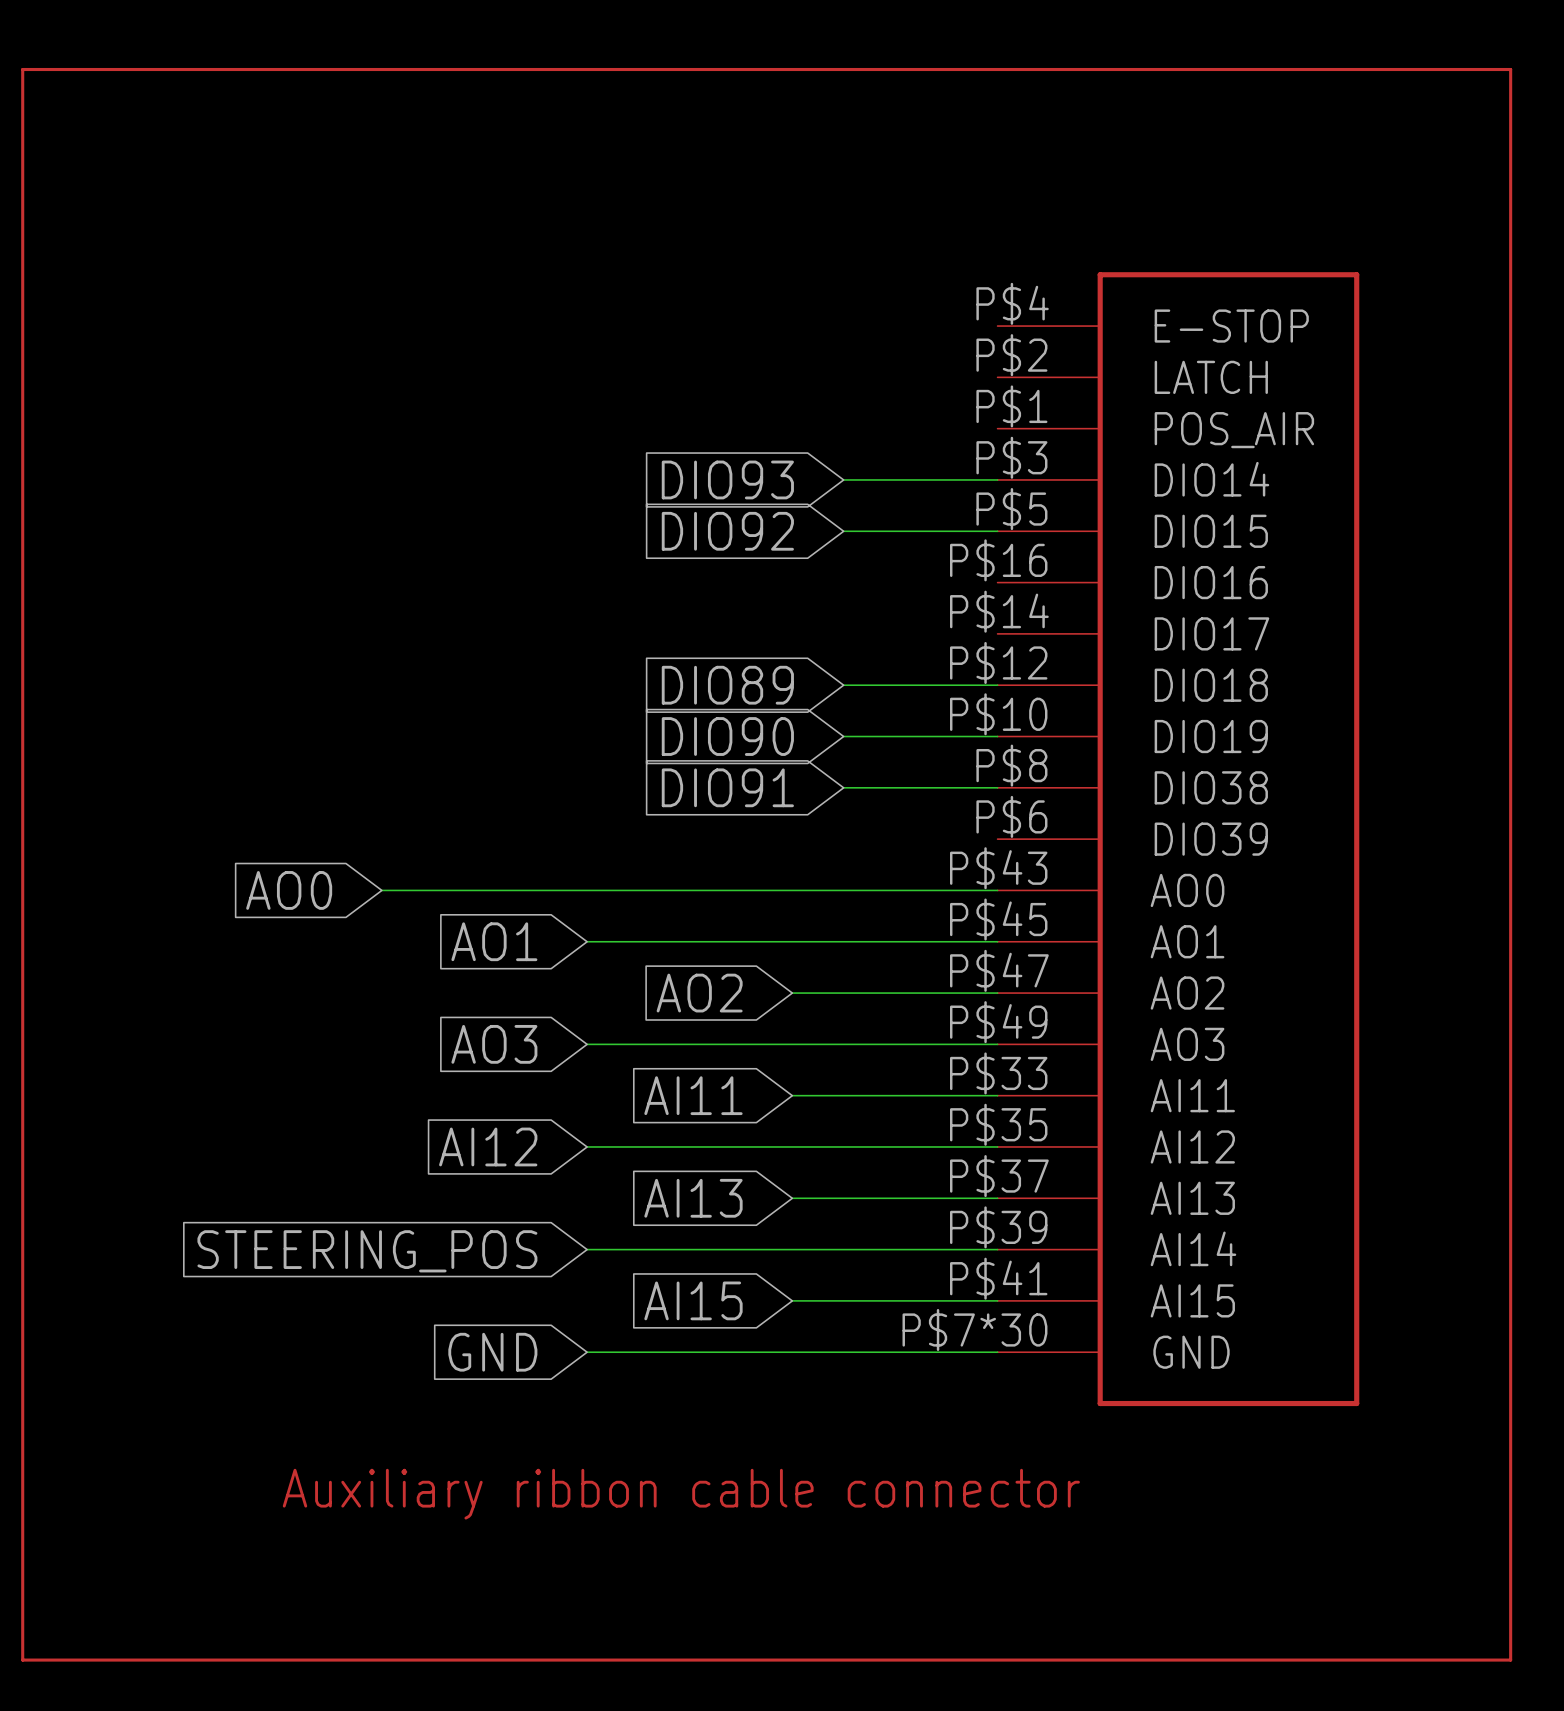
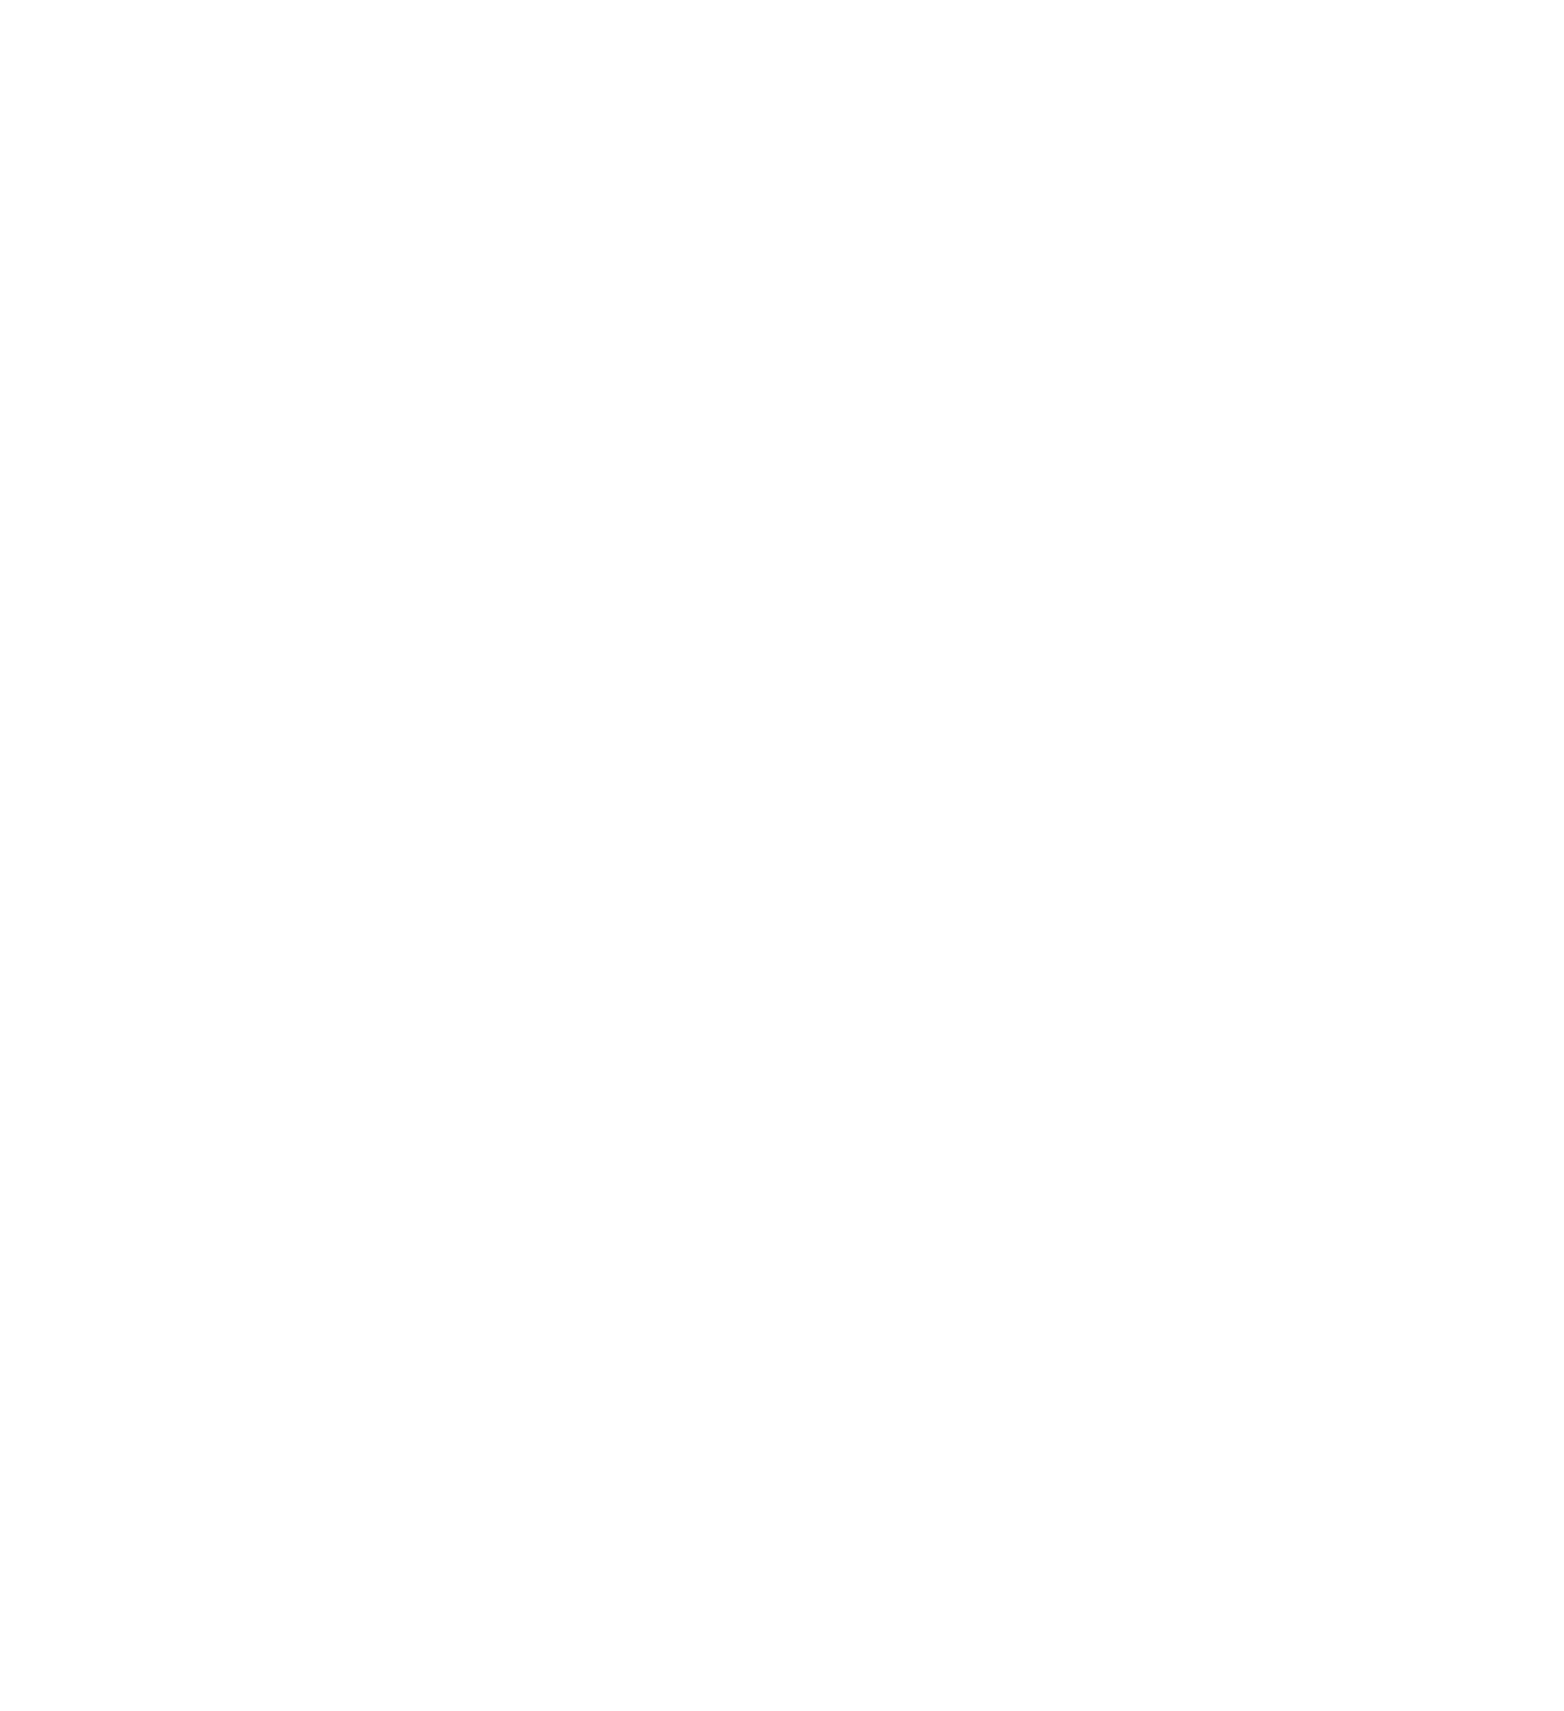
line: (22, 69) (1510, 69) (1510, 1660) (22, 1660) (22, 69) -> none
global label: DIO93 (727, 479) -> none
wire: (843, 479) (997, 479) -> none
global label: DIO92 (727, 531) -> none
wire: (843, 531) (997, 531) -> none
global label: DIO89 (727, 685) -> none
wire: (843, 685) (997, 685) -> none
global label: DIO90 (727, 736) -> none
wire: (843, 736) (997, 736) -> none
global label: DIO91 (727, 787) -> none
wire: (843, 787) (997, 787) -> none
part: (1178, 839) -> none
global label: AO0 (289, 890) -> none
wire: (381, 890) (997, 890) -> none
global label: AO1 (494, 941) -> none
wire: (587, 941) (997, 941) -> none
global label: AO2 (699, 993) -> none
wire: (792, 993) (997, 993) -> none
global label: AO3 (494, 1044) -> none
wire: (587, 1044) (997, 1044) -> none
global label: AI11 (693, 1095) -> none
wire: (792, 1095) (997, 1095) -> none
global label: AI12 (488, 1146) -> none
wire: (587, 1146) (997, 1146) -> none
global label: AI13 (693, 1198) -> none
wire: (792, 1198) (997, 1198) -> none
wire: (587, 1249) (997, 1249) -> none
global label: STEERING_POS (367, 1251) -> none
global label: AI15 (693, 1300) -> none
wire: (792, 1300) (997, 1300) -> none
global label: GND (492, 1352) -> none
wire: (587, 1352) (997, 1352) -> none
text: Auxiliary ribbon cable connector (681, 1494) -> none

